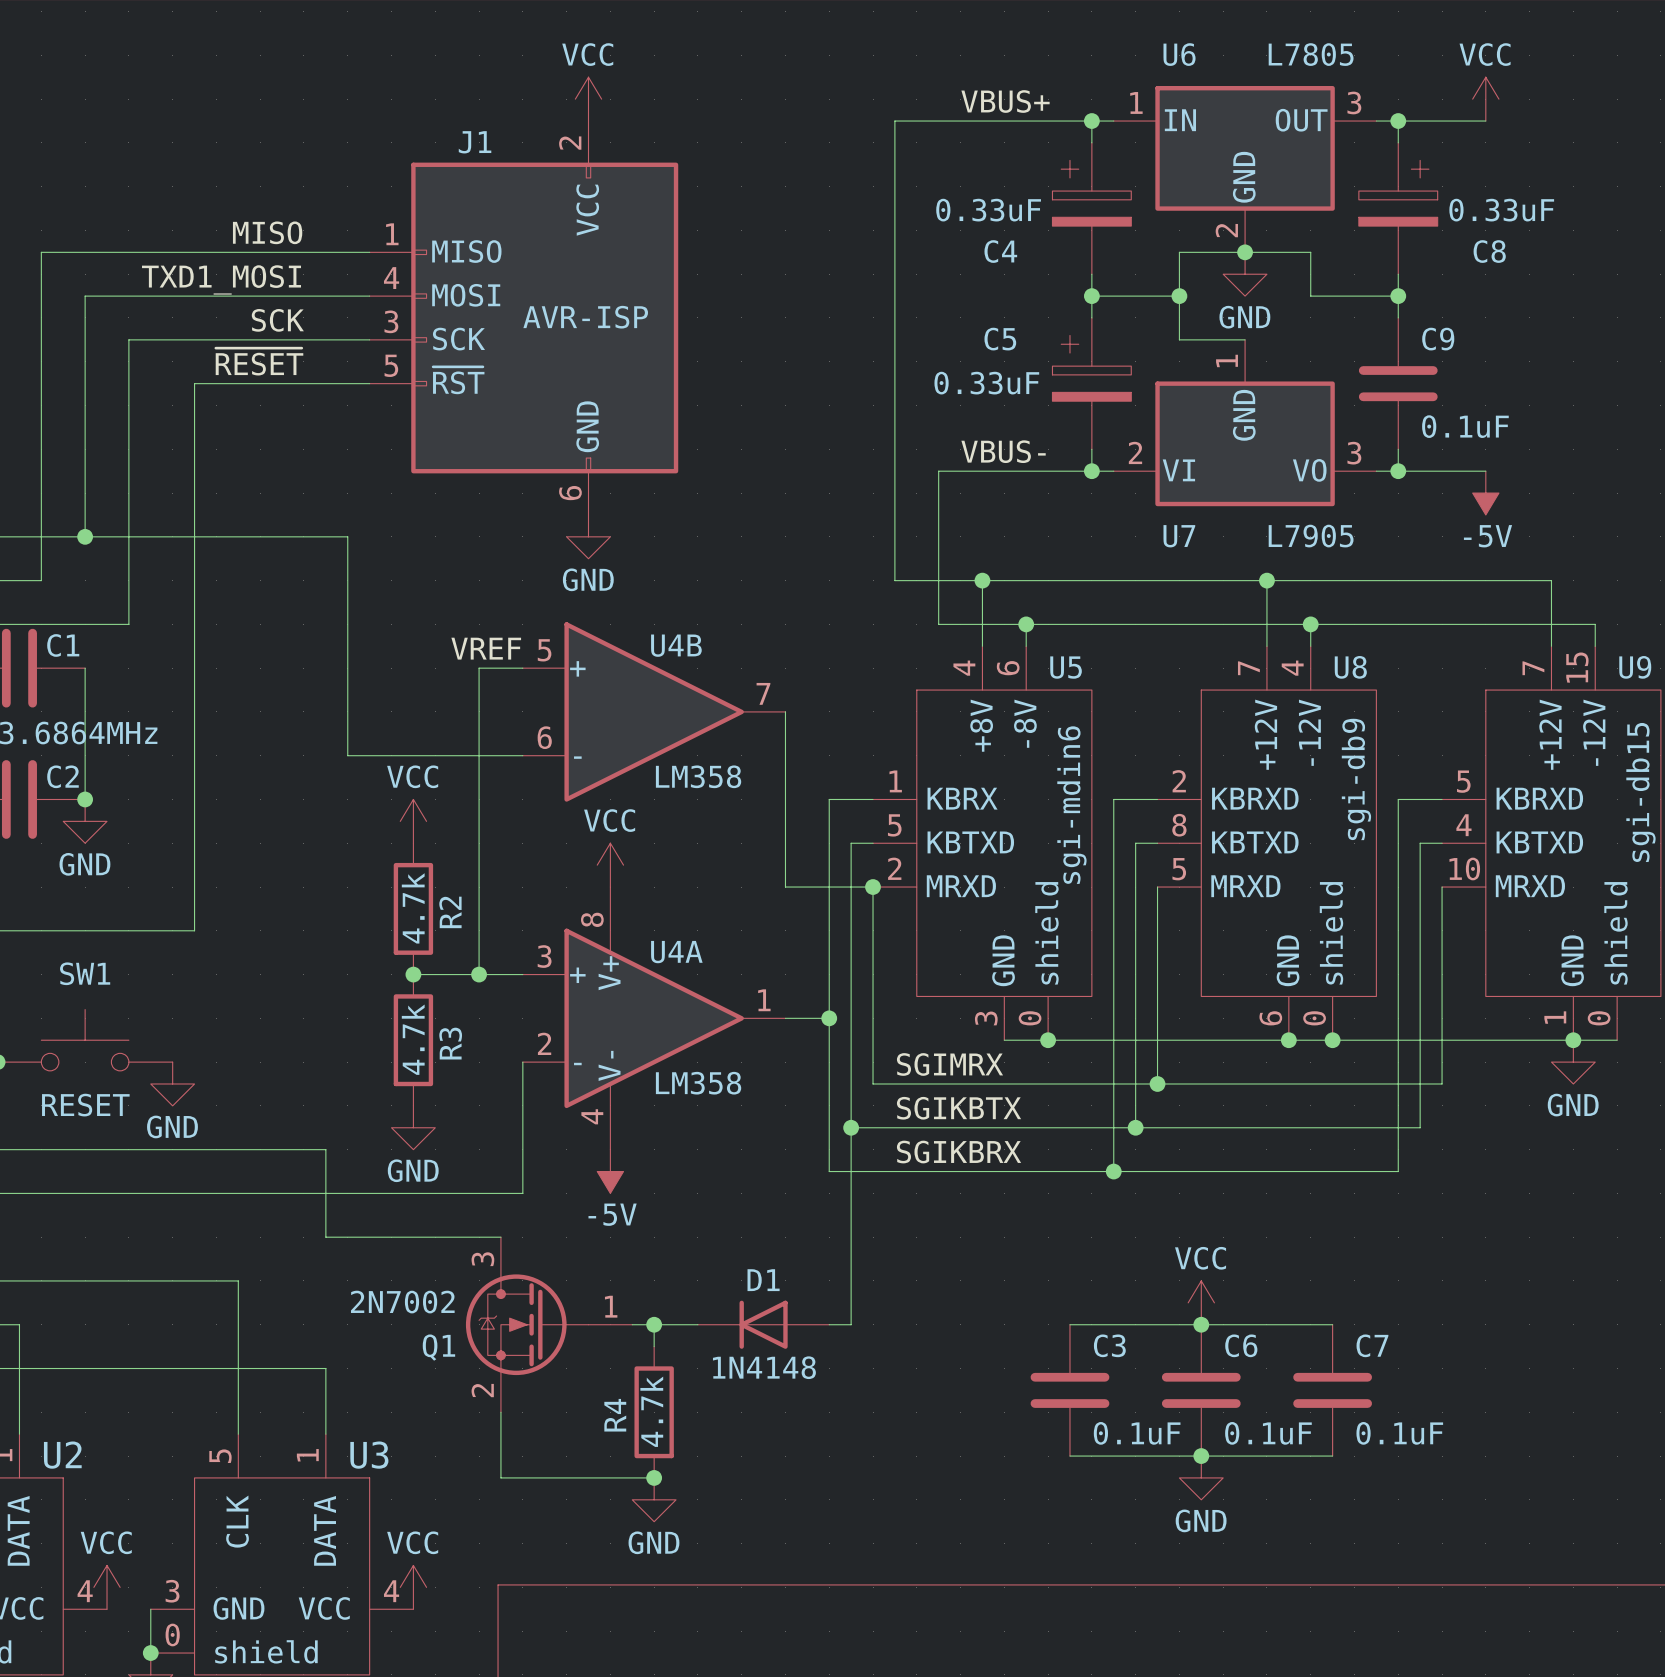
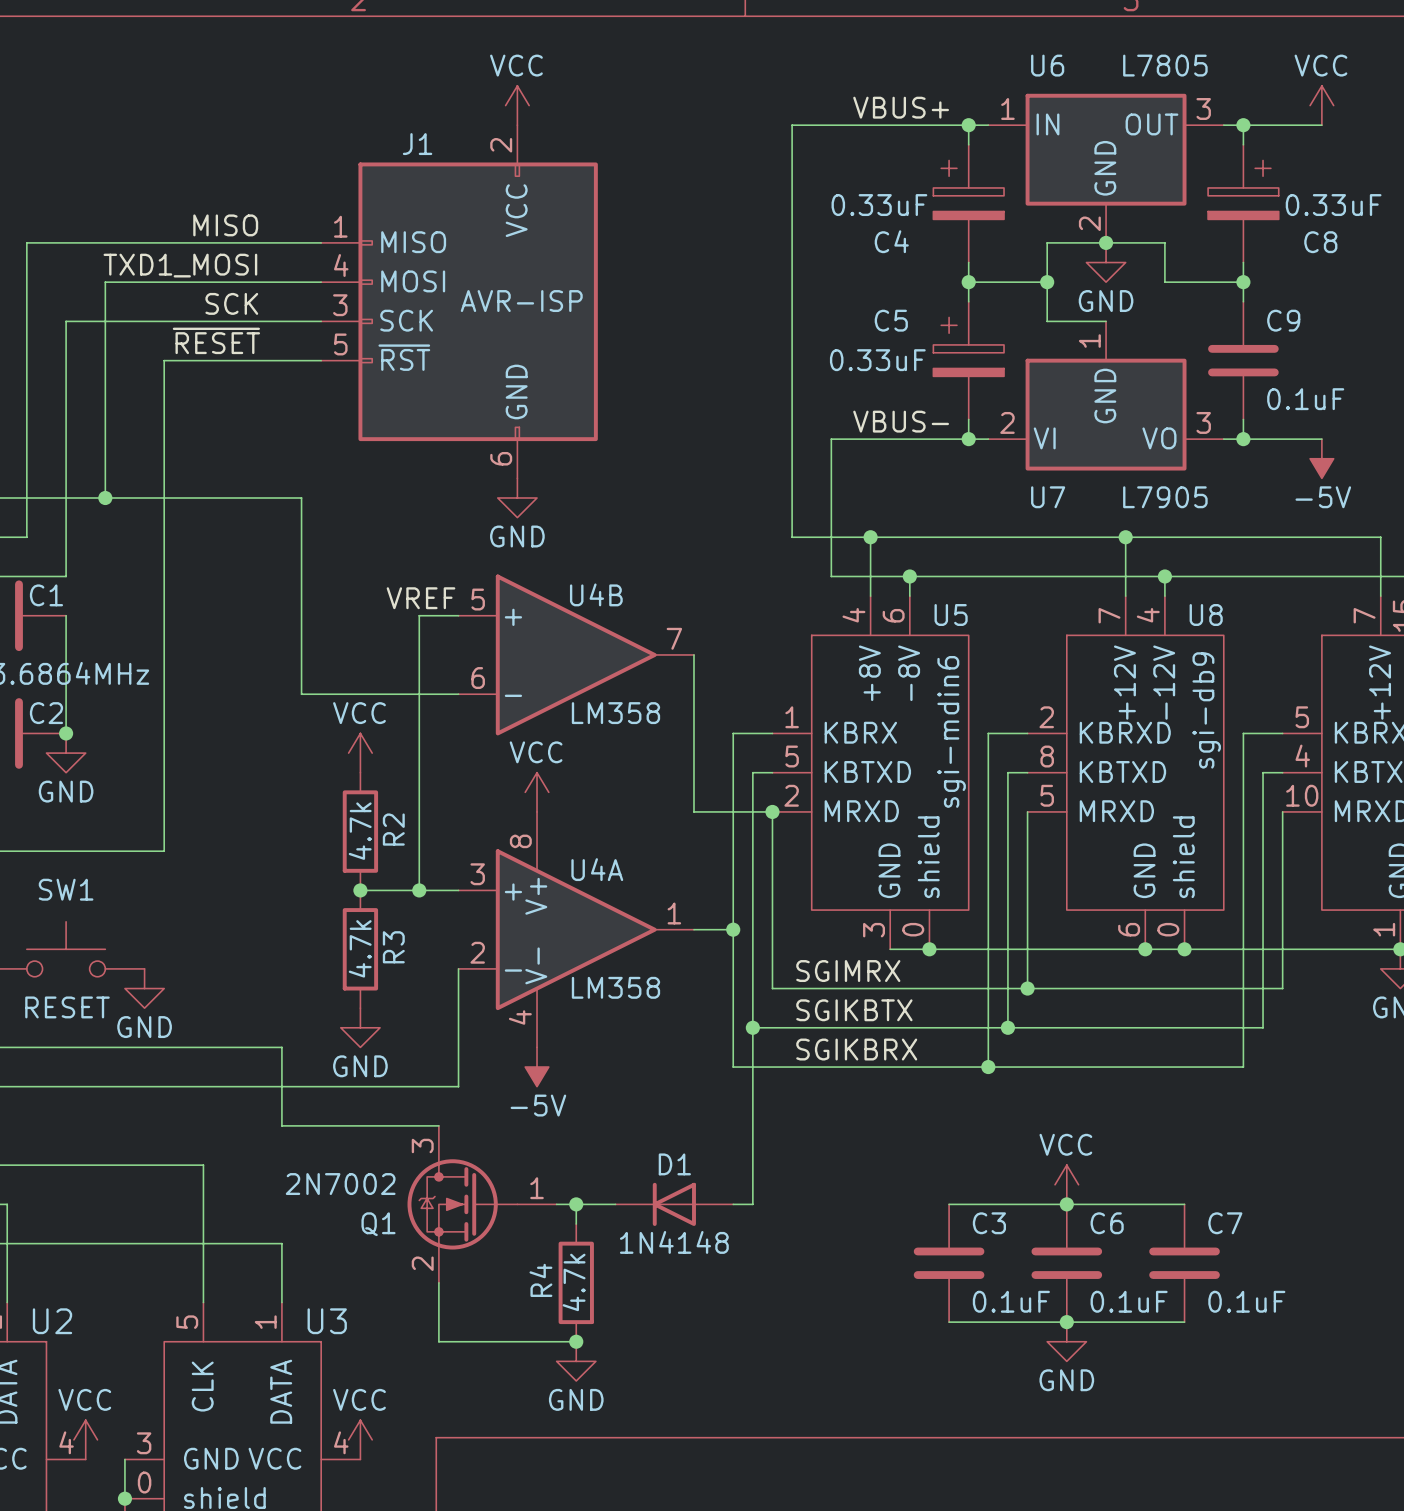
wire: (128, 296) (85, 296) (85, 339) -> (105, 282) (105, 321) (66, 321)
junction position: (85, 536) -> (105, 498)
wire: (128, 536) (128, 624) (85, 624) -> (66, 498) (66, 576)

